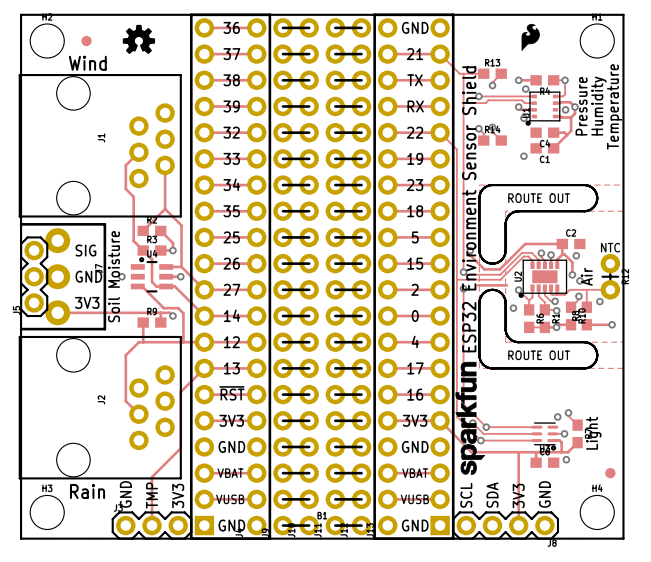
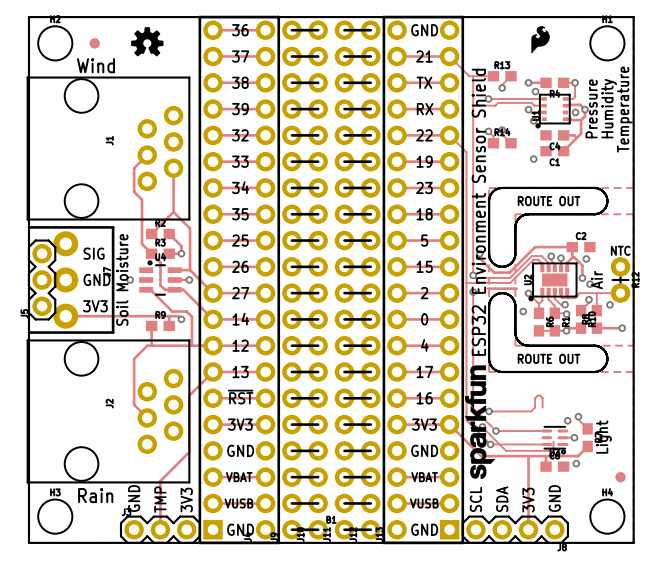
track: none -> (542, 407) (542, 397) (537, 395) (535, 398) (535, 407) (531, 411) (489, 411)
via: none -> (489, 411)
track: (472, 423) (483, 433) (536, 433) -> (482, 426) (506, 450) (552, 450) (553, 441)
track: (552, 440) (561, 442) (561, 452) -> none

